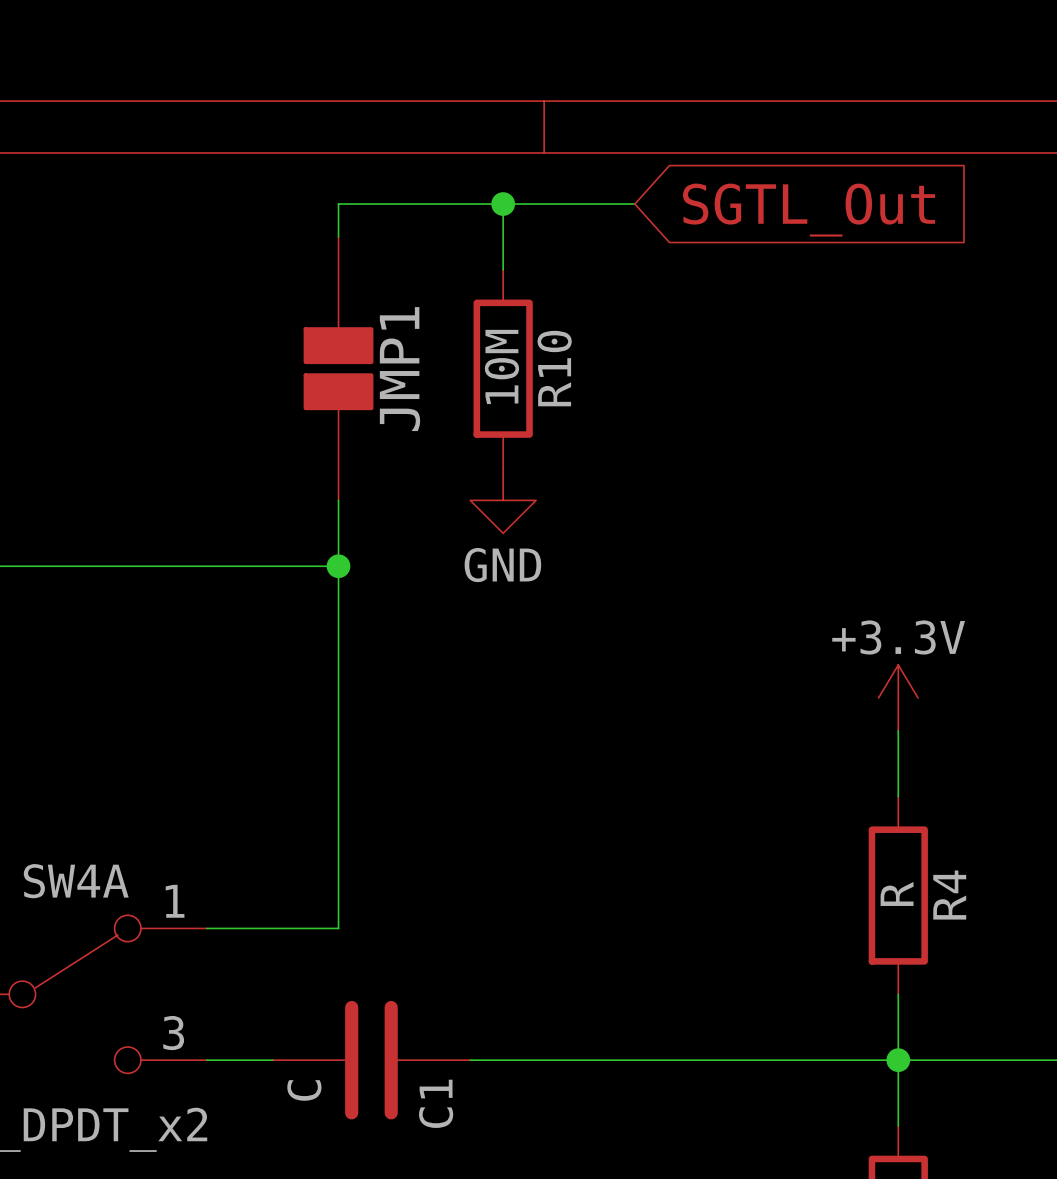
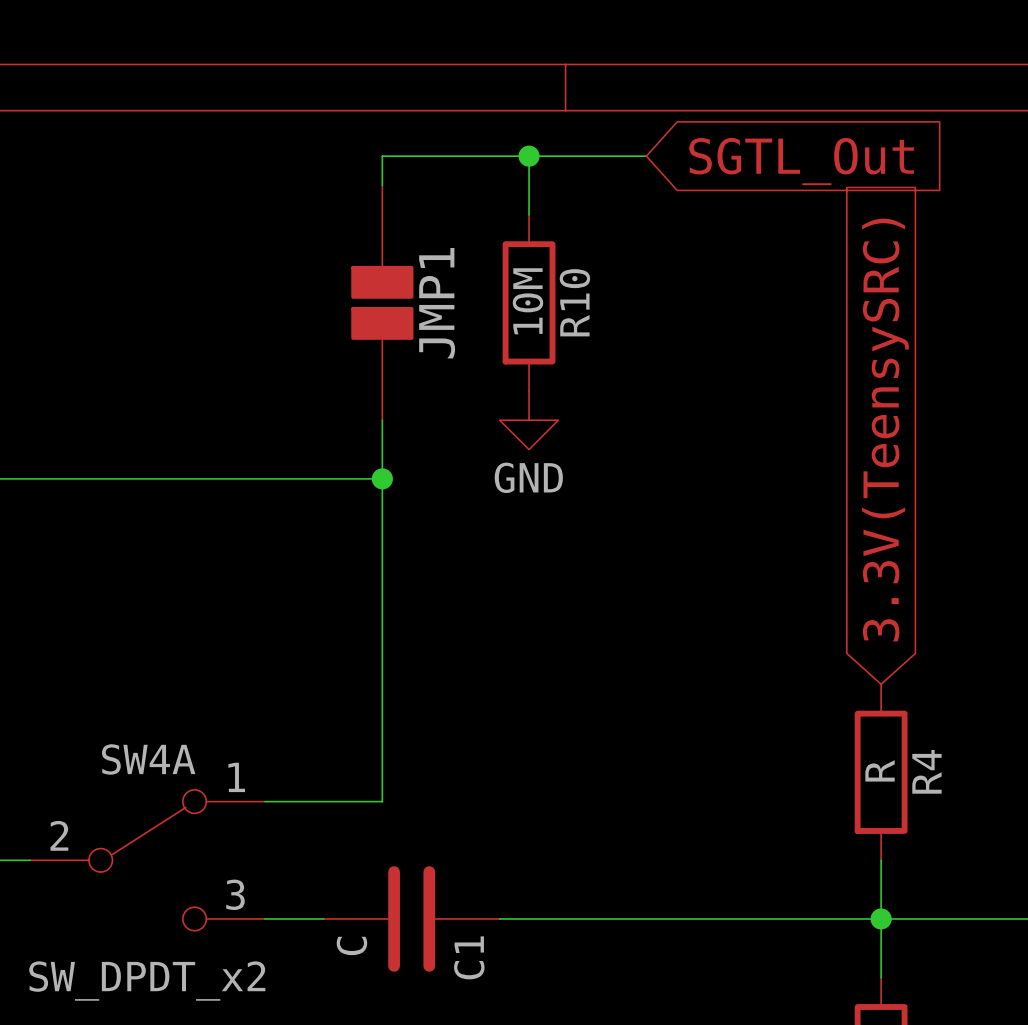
global label: none -> 3.3V(TeensySRC) (885, 430)
power symbol: +3.3V (898, 697) -> none
wire: (898, 730) (898, 796) -> none

